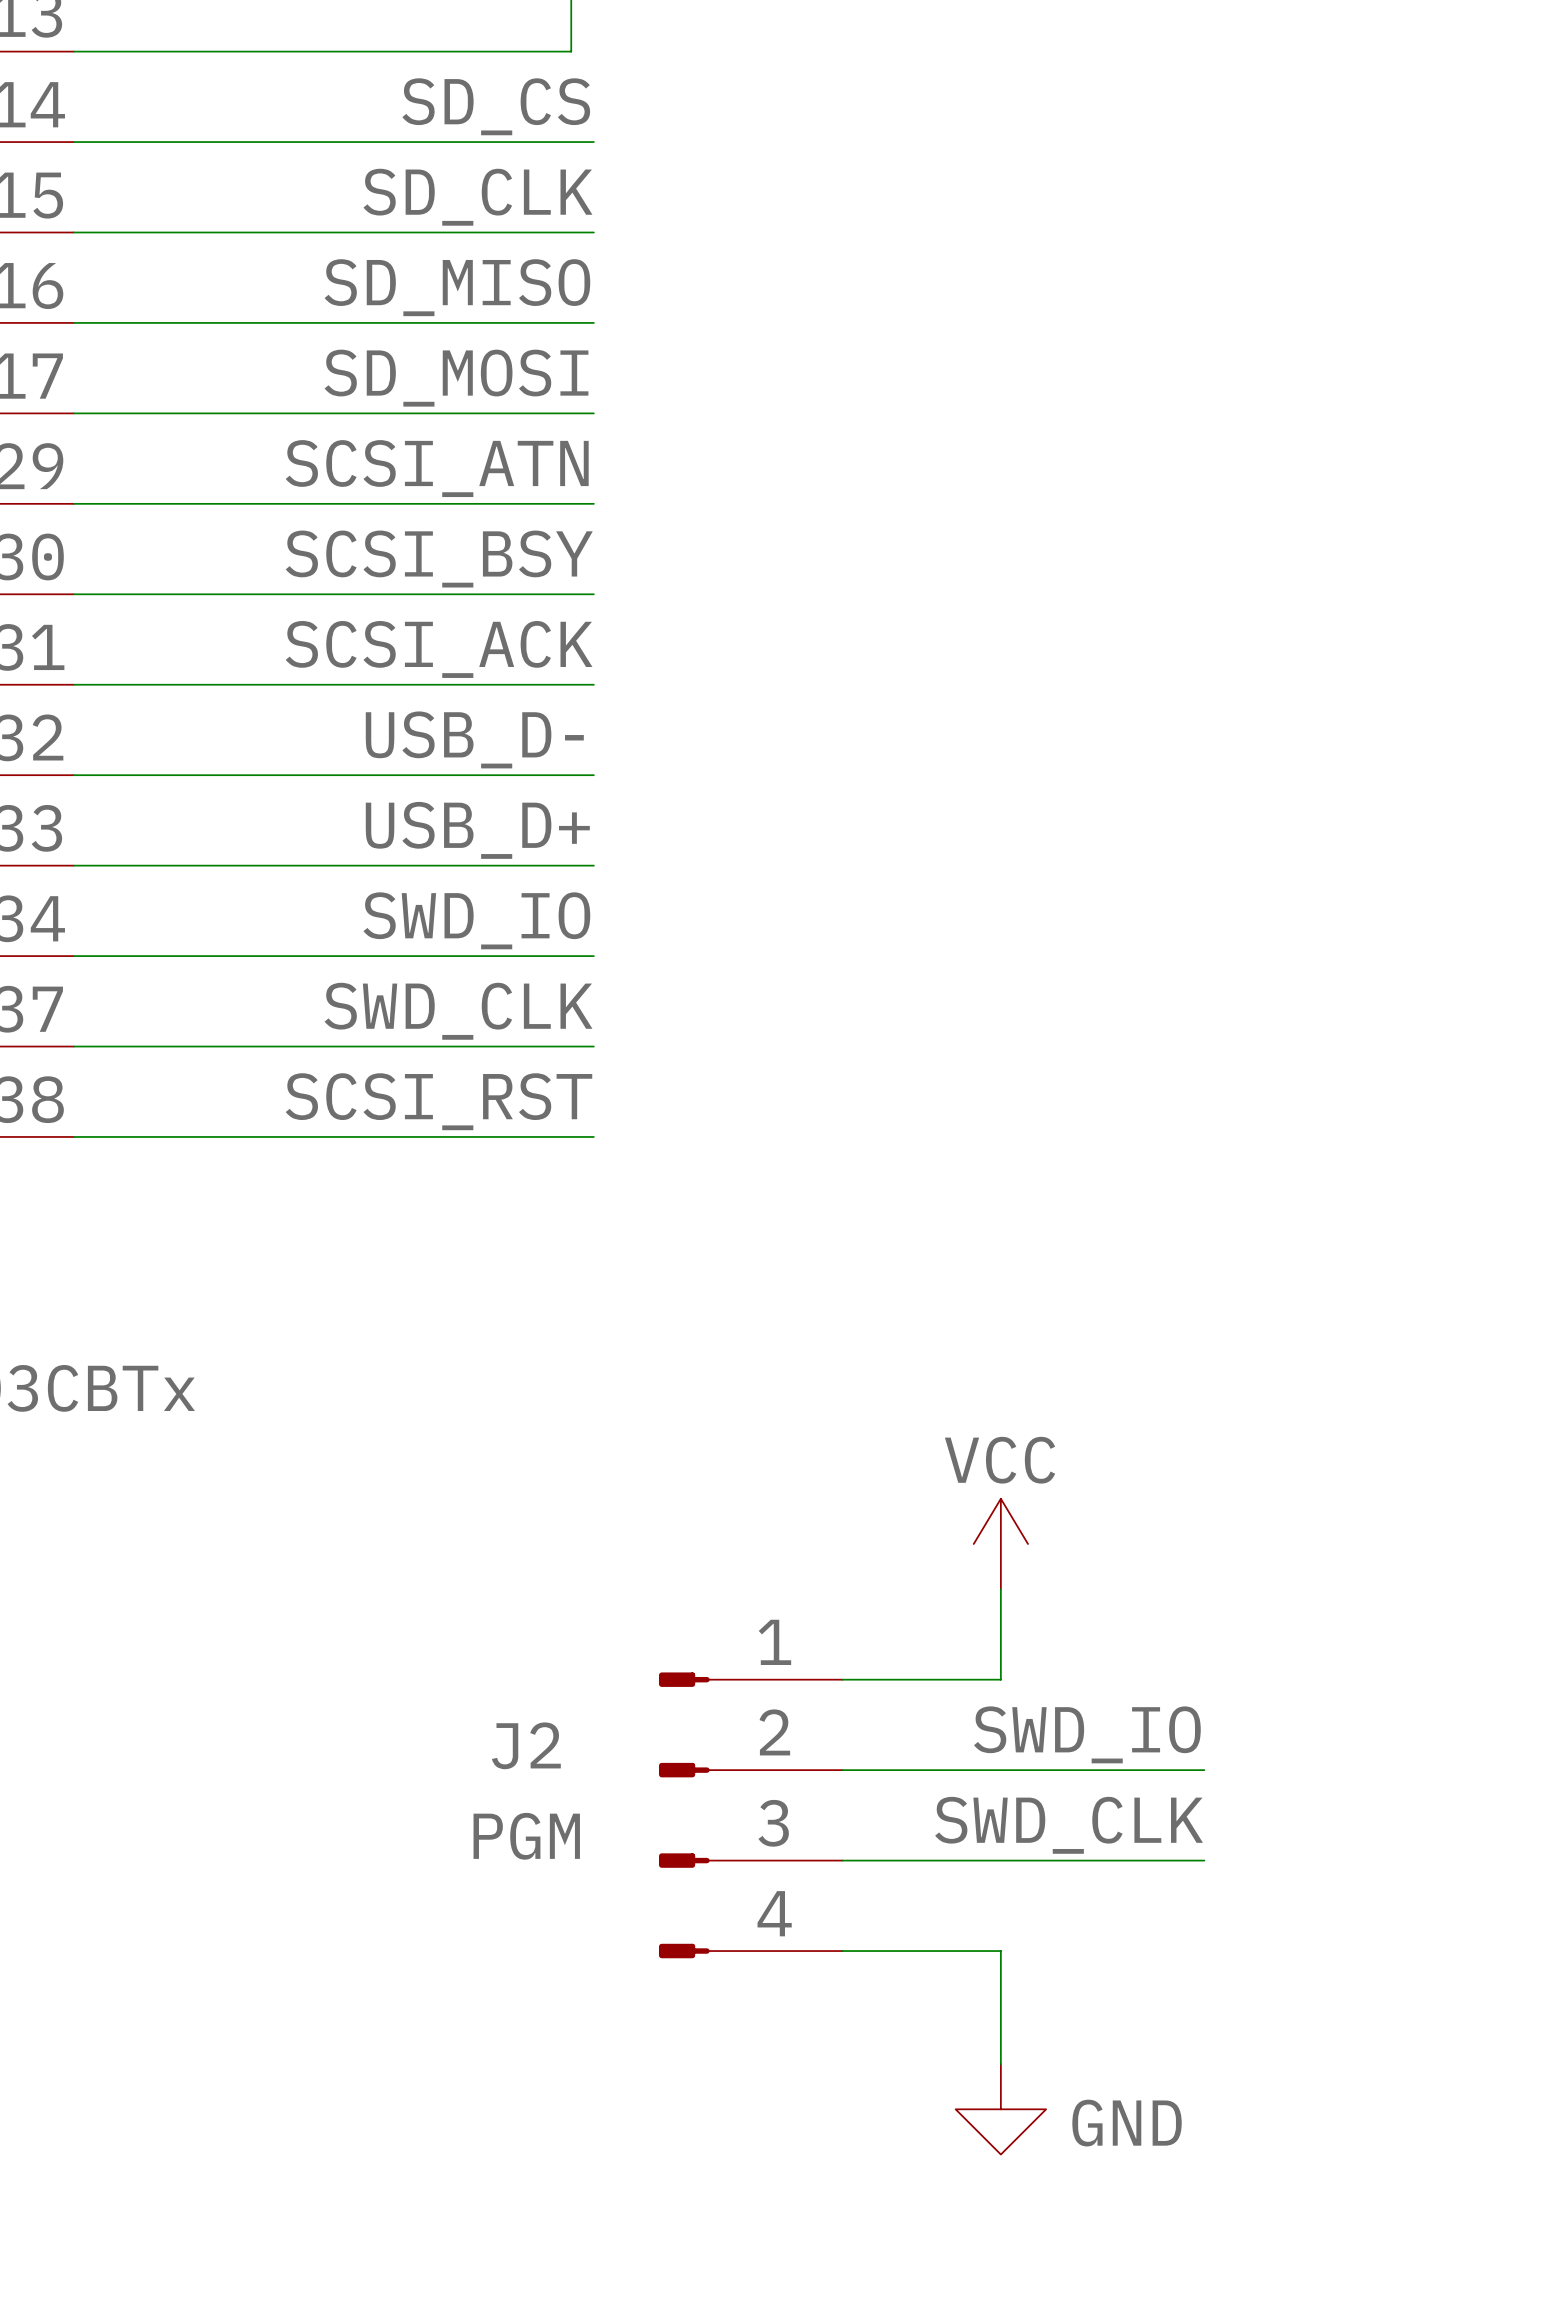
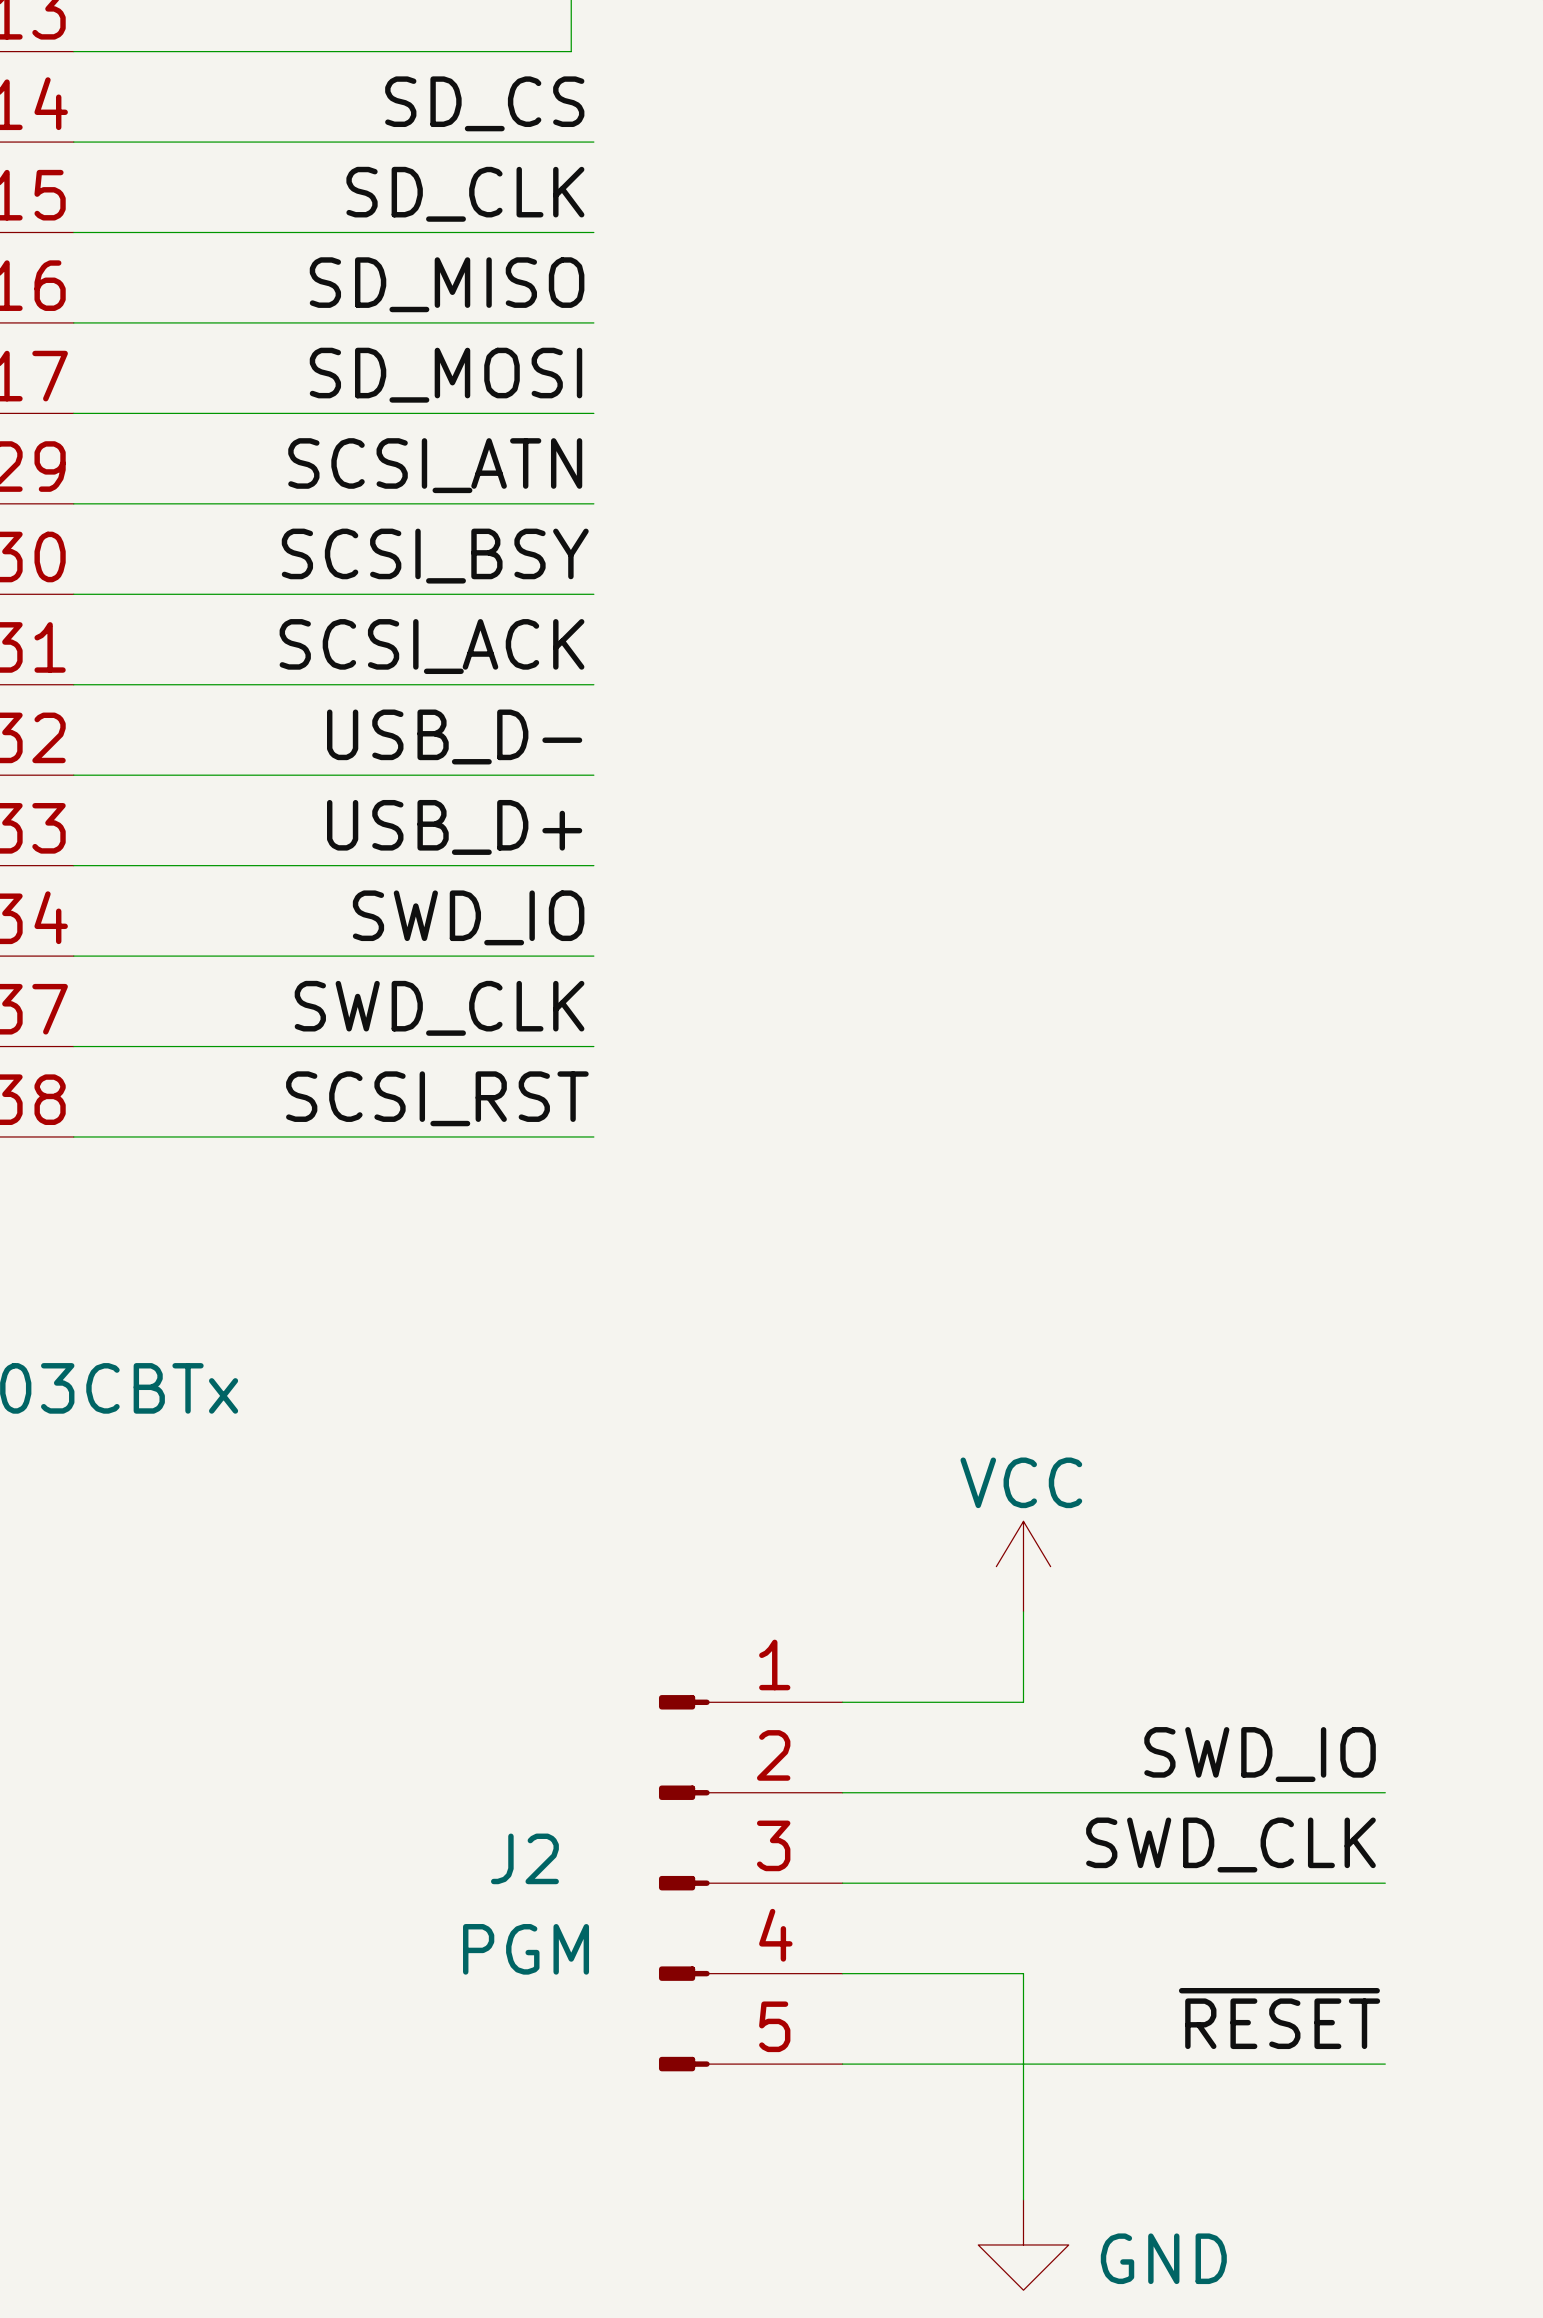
power symbol position: VCC (1000, 1544) -> VCC (1023, 1566)
wire: (1000, 1589) (1000, 1679) (842, 1679) -> none
wire: none -> (1023, 1611) (1023, 1702) (842, 1702)
J2 symbol: [658, 1672, 843, 1959] -> [658, 1695, 843, 2072]
label position: SWD_IO (1087, 1734) -> SWD_IO (1260, 1754)
wire: (842, 1770) (1204, 1770) -> none
wire: none -> (842, 1792) (1385, 1792)
label position: SWD_CLK (1069, 1825) -> SWD_CLK (1230, 1844)
wire: (842, 1860) (1204, 1860) -> none
wire: none -> (842, 1883) (1385, 1883)
wire: (842, 1951) (1000, 1951) (1000, 2064) -> none
wire: none -> (842, 1973) (1023, 1973) (1023, 2199)
label: none -> ~{RESET} (1279, 2018)
wire: none -> (842, 2064) (1385, 2064)
power symbol position: GND (1000, 2109) -> GND (1023, 2244)

